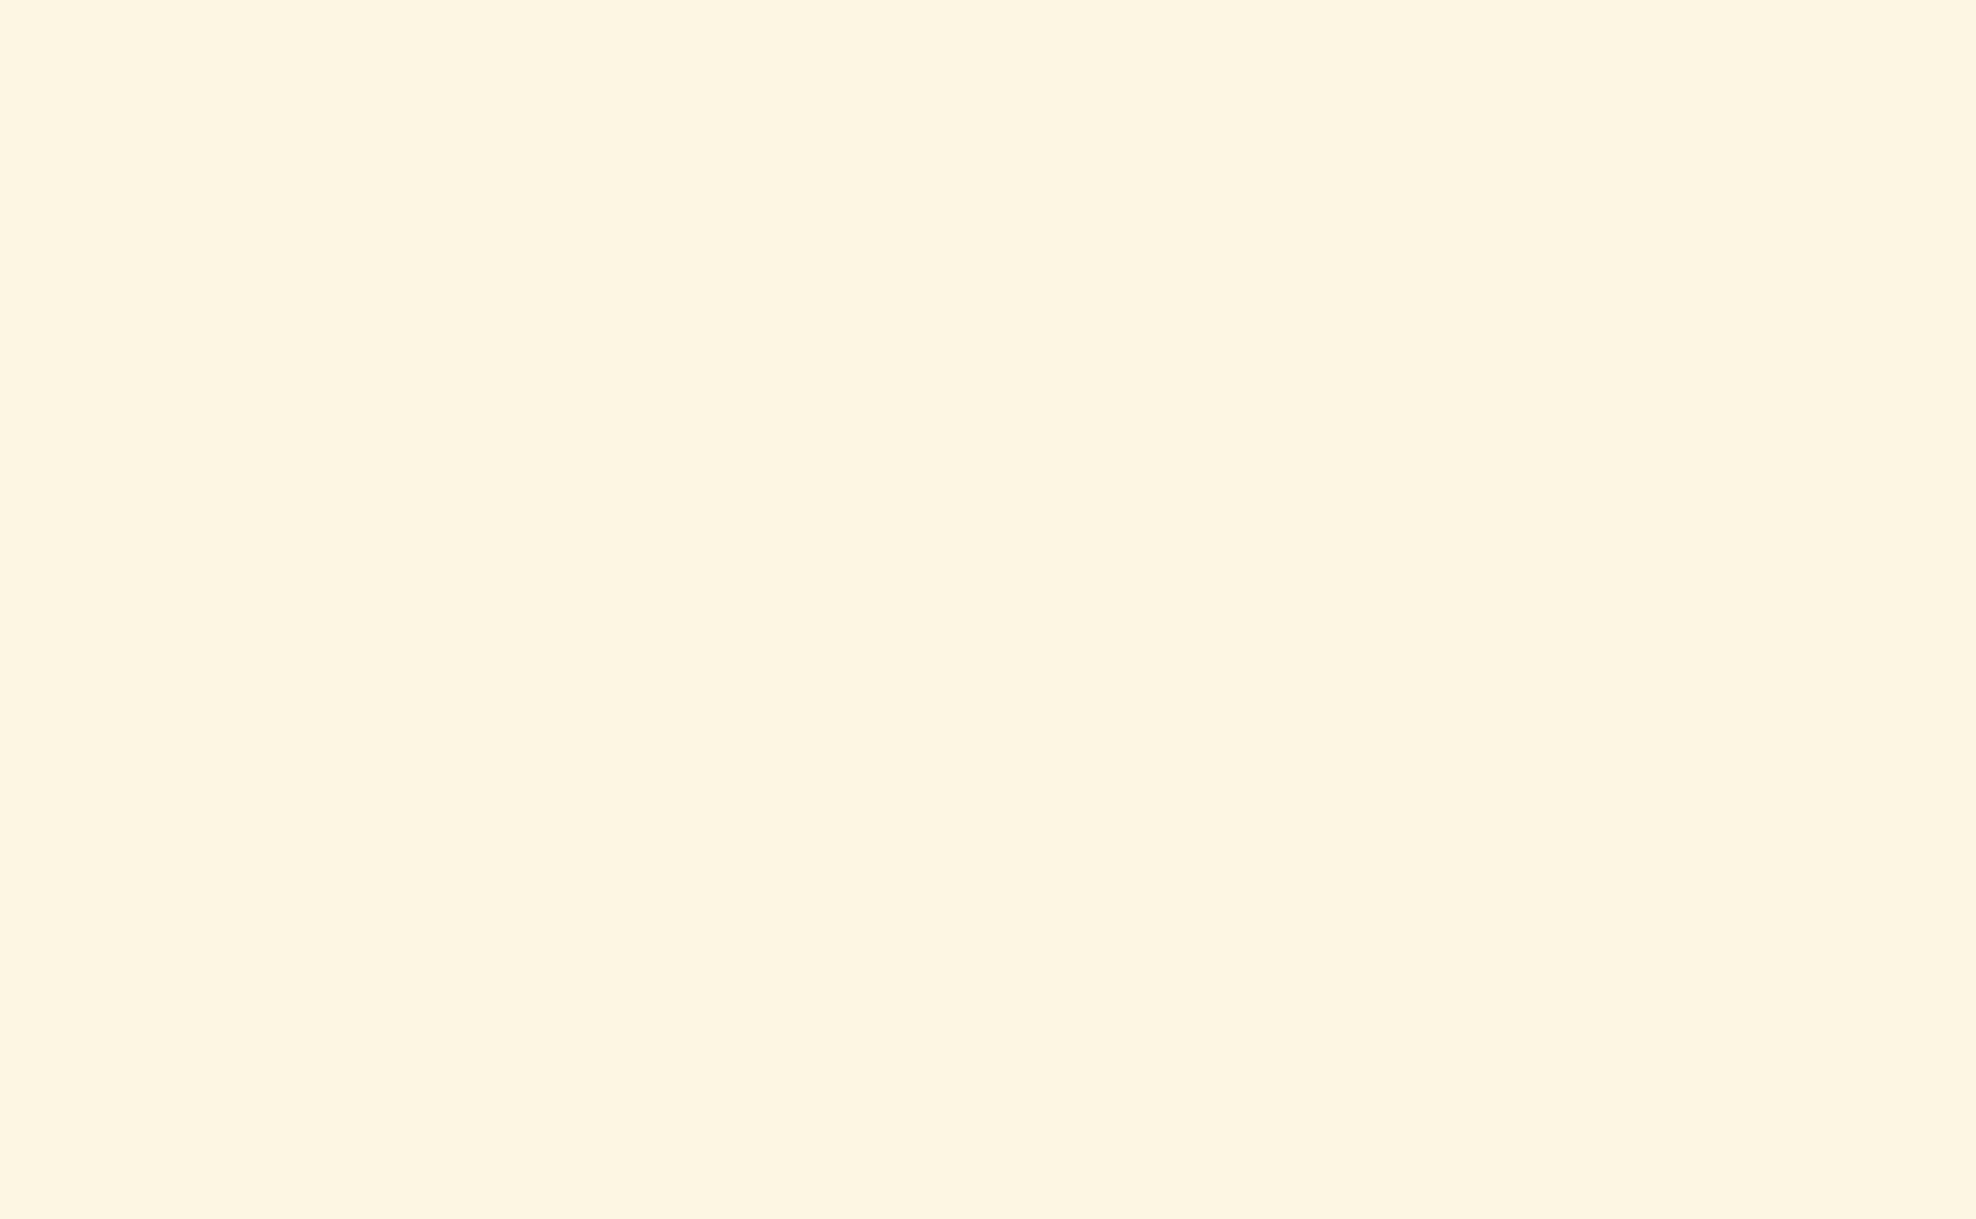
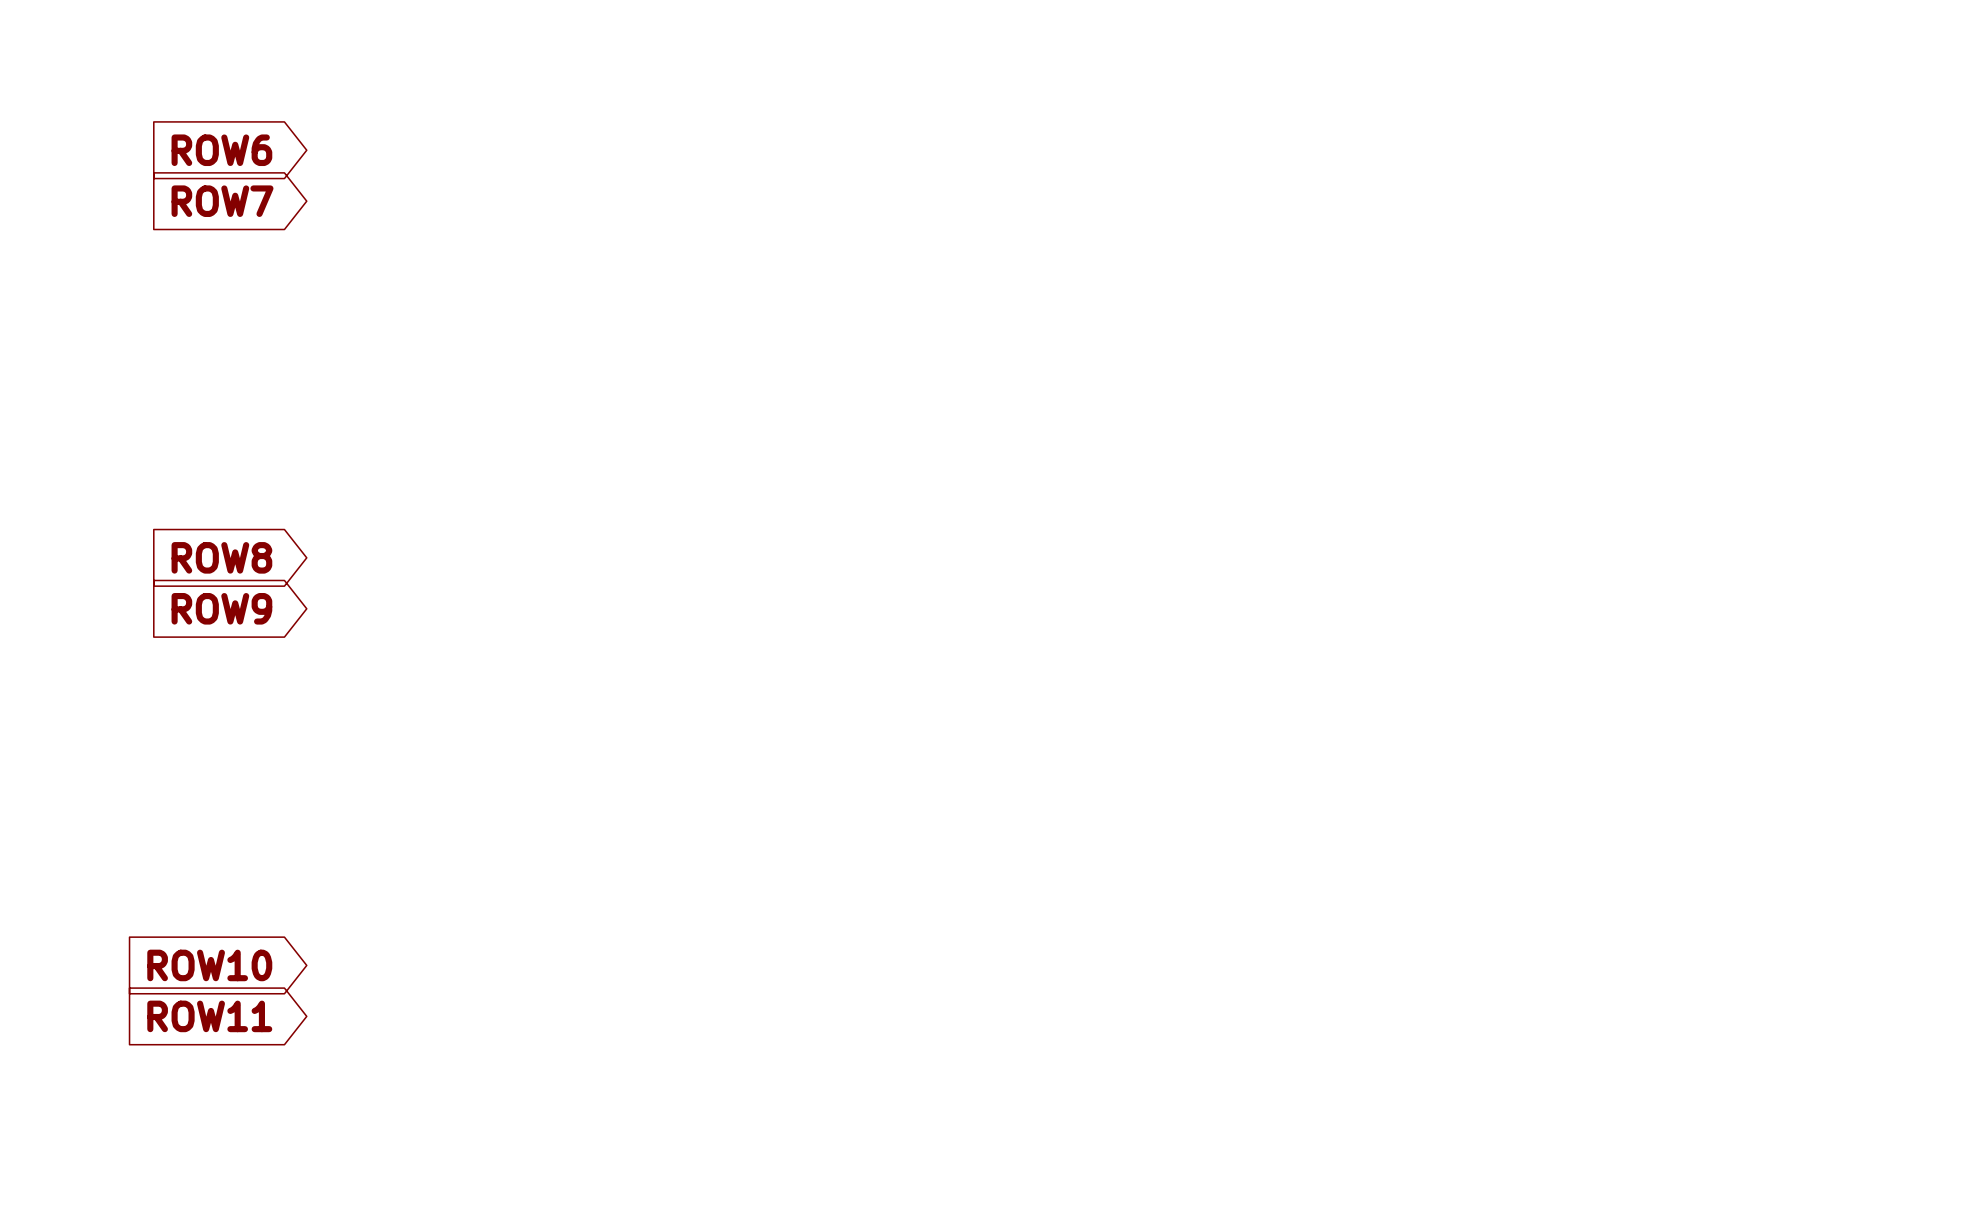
global label: none -> ROW6 (221, 150)
global label: none -> ROW7 (222, 201)
global label: none -> ROW8 (221, 557)
global label: none -> ROW9 (221, 608)
global label: none -> ROW10 (209, 965)
global label: none -> ROW11 (209, 1016)

